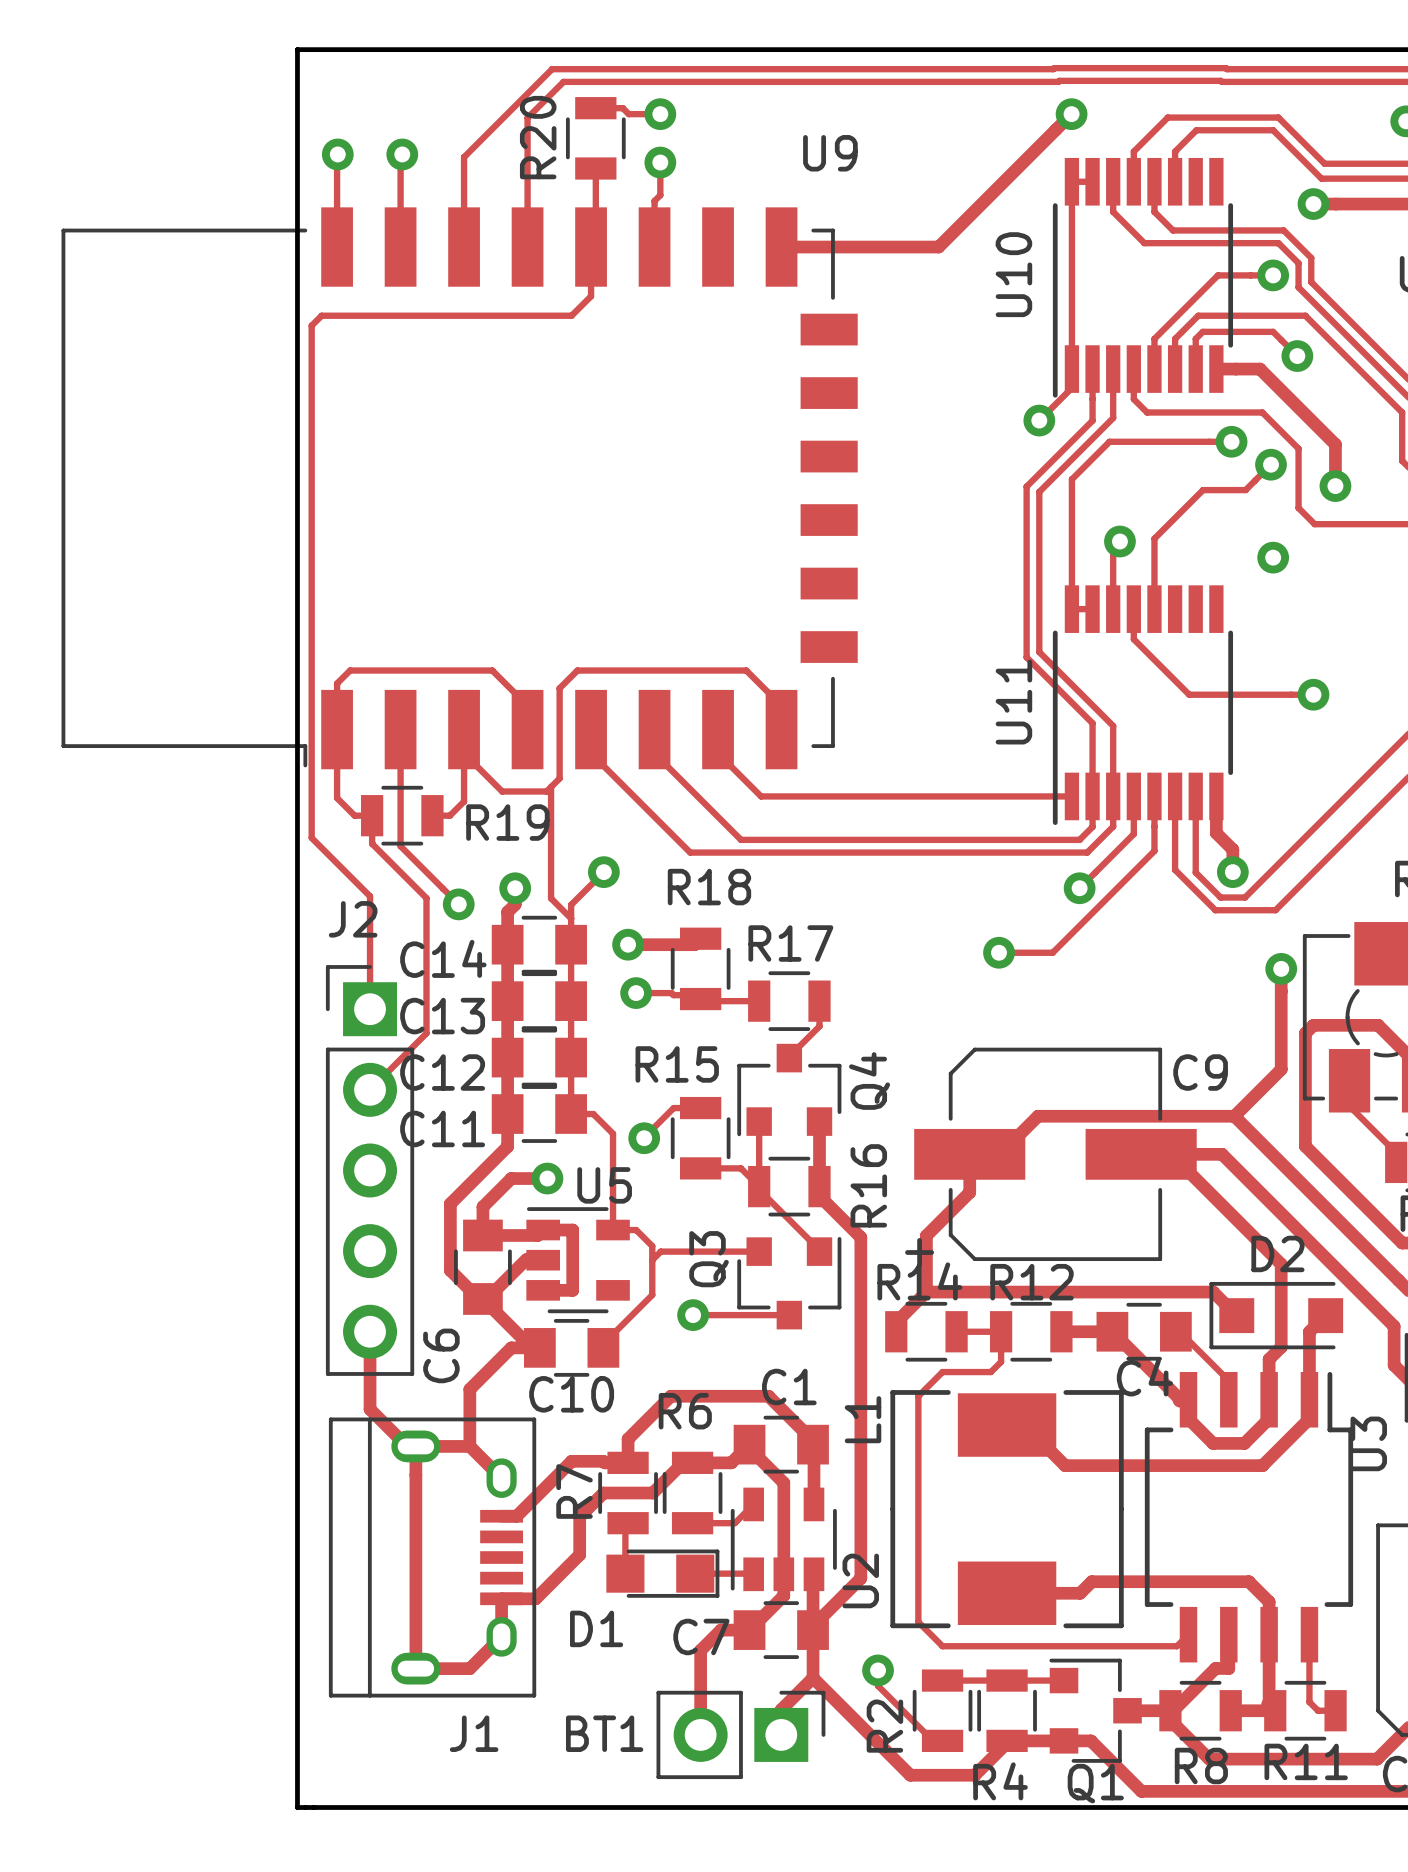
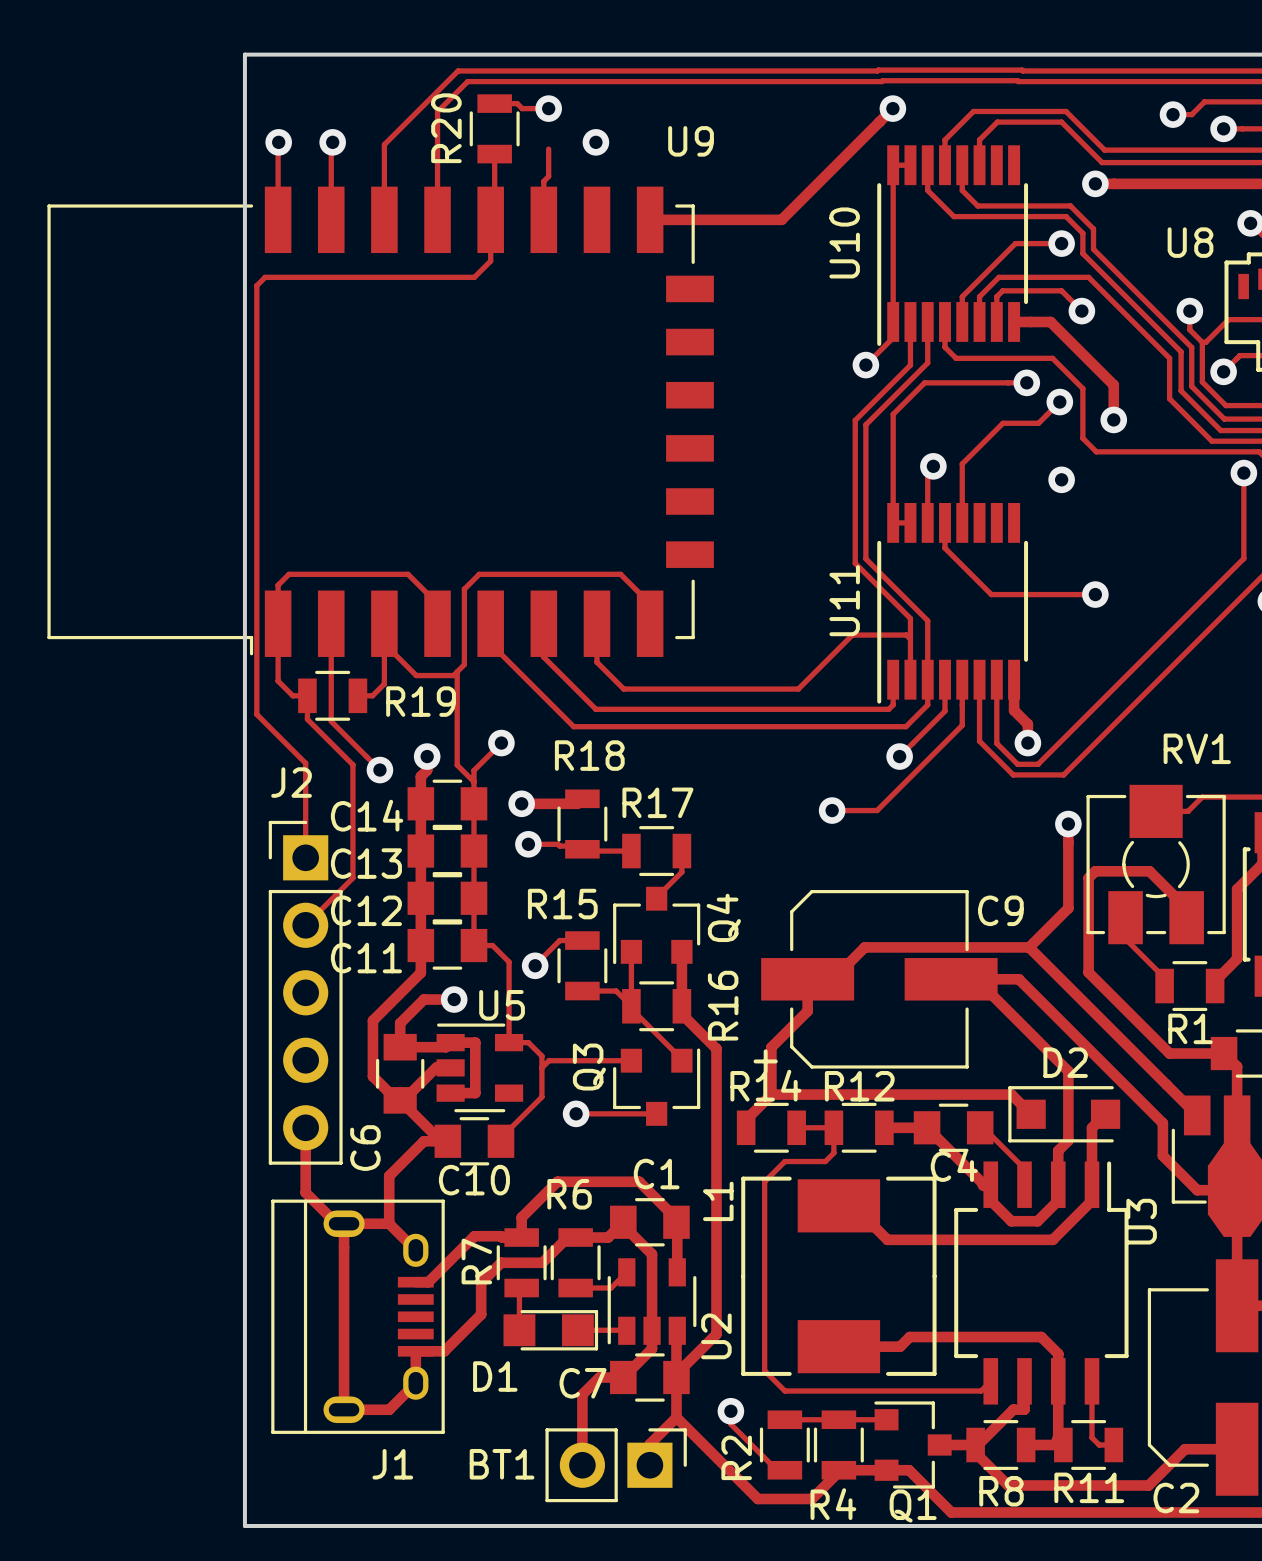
via position: (660, 162) -> (595, 142)
track: (654, 753) (741, 839) (1079, 839) (1092, 826) (1092, 796) -> (543, 643) (543, 657) (595, 709) (888, 709) (893, 704) (893, 679)
track: (718, 753) (761, 796) (1071, 796) -> (596, 643) (596, 662) (623, 689) (798, 689) (852, 635) (906, 635) (910, 639)

